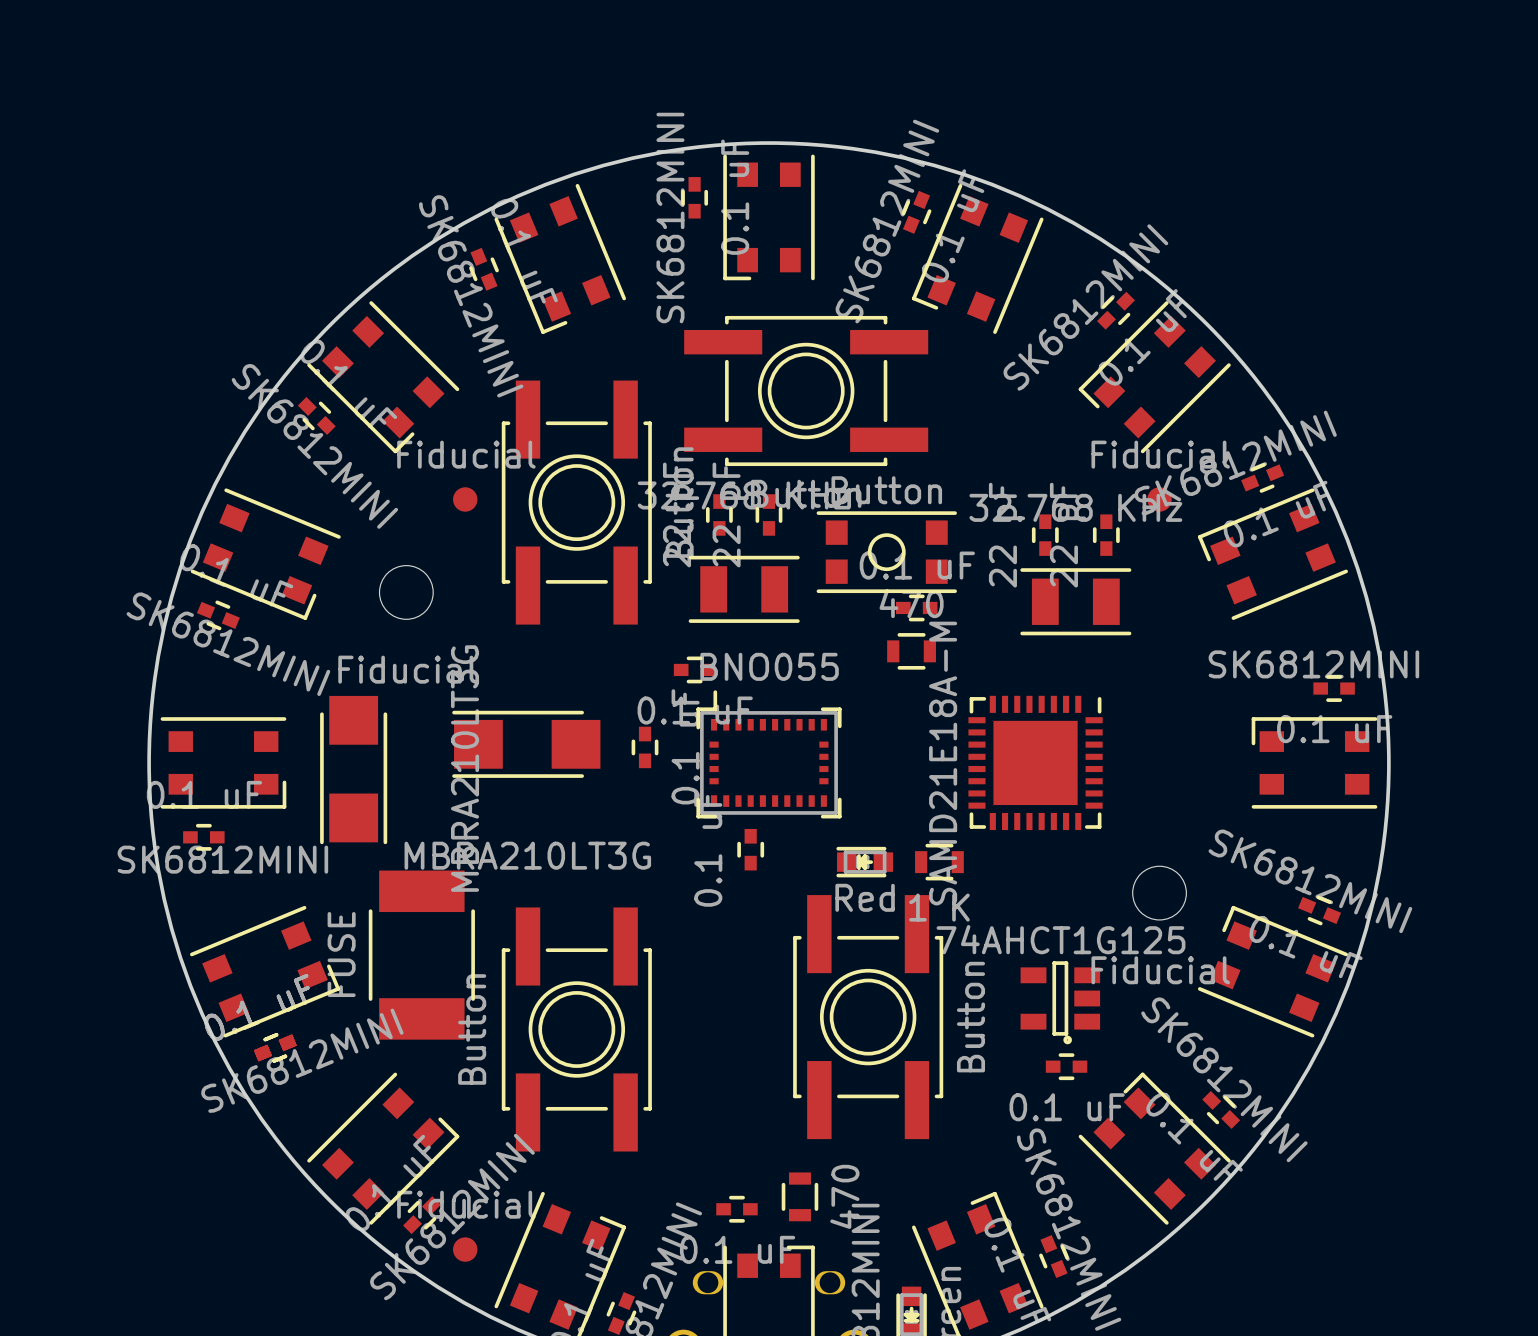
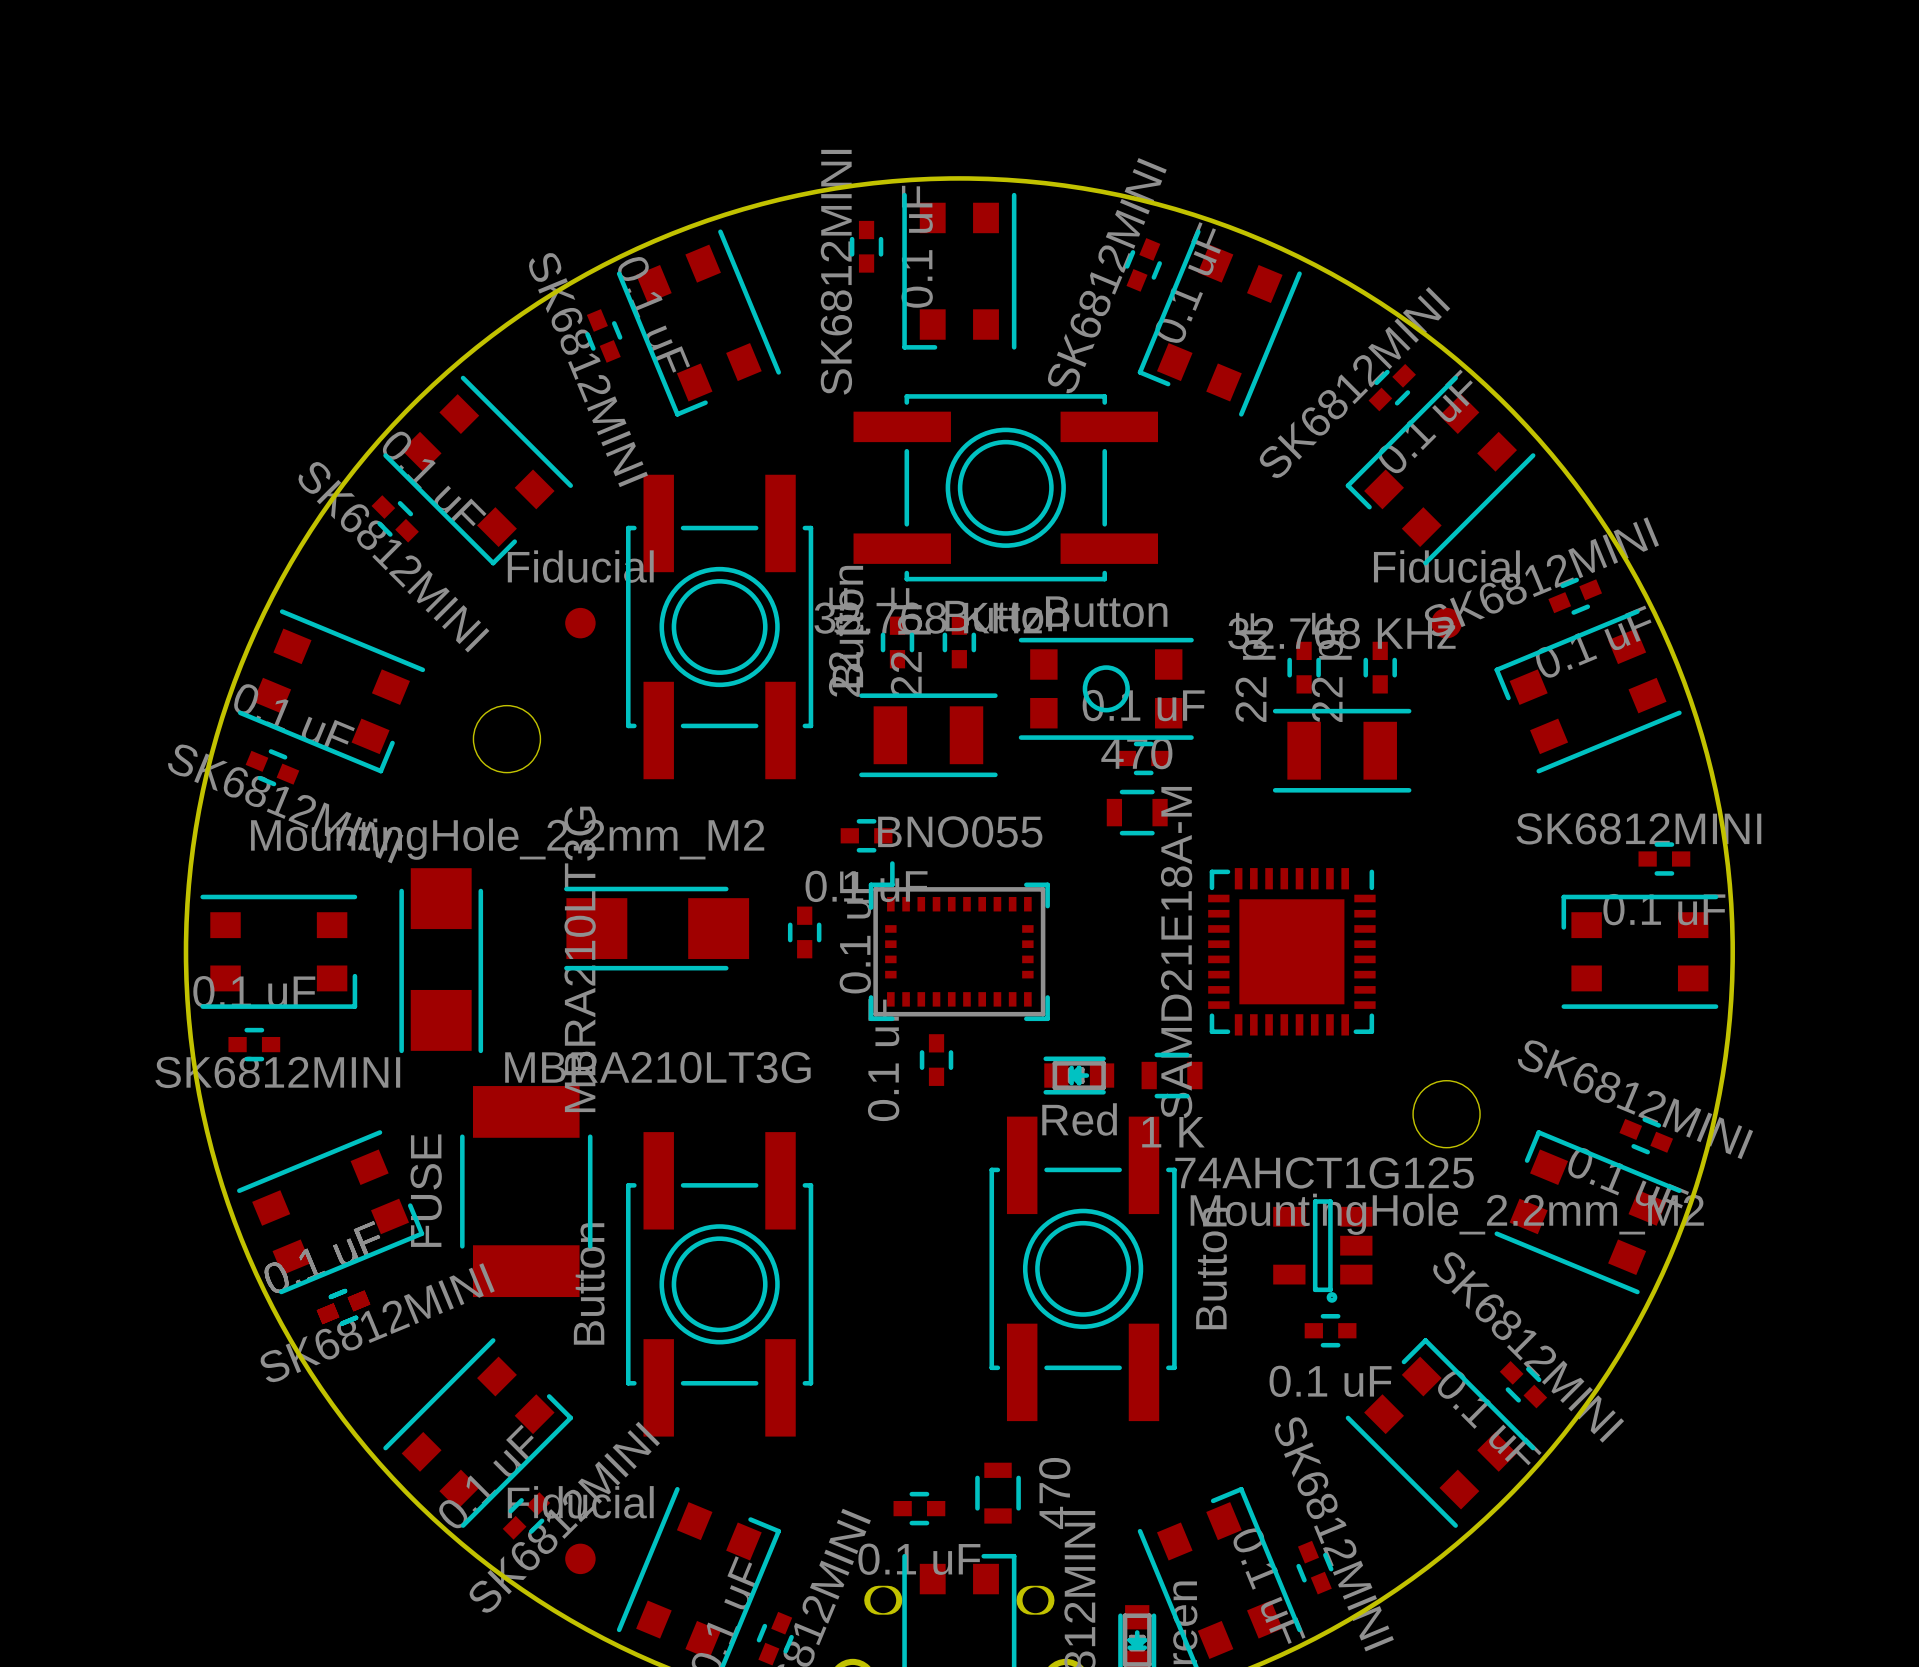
part value: Fiducial (407, 669) -> MountingHole_2.2mm_M2 (507, 839)
part value: Fiducial (1160, 970) -> MountingHole_2.2mm_M2 (1447, 1214)

